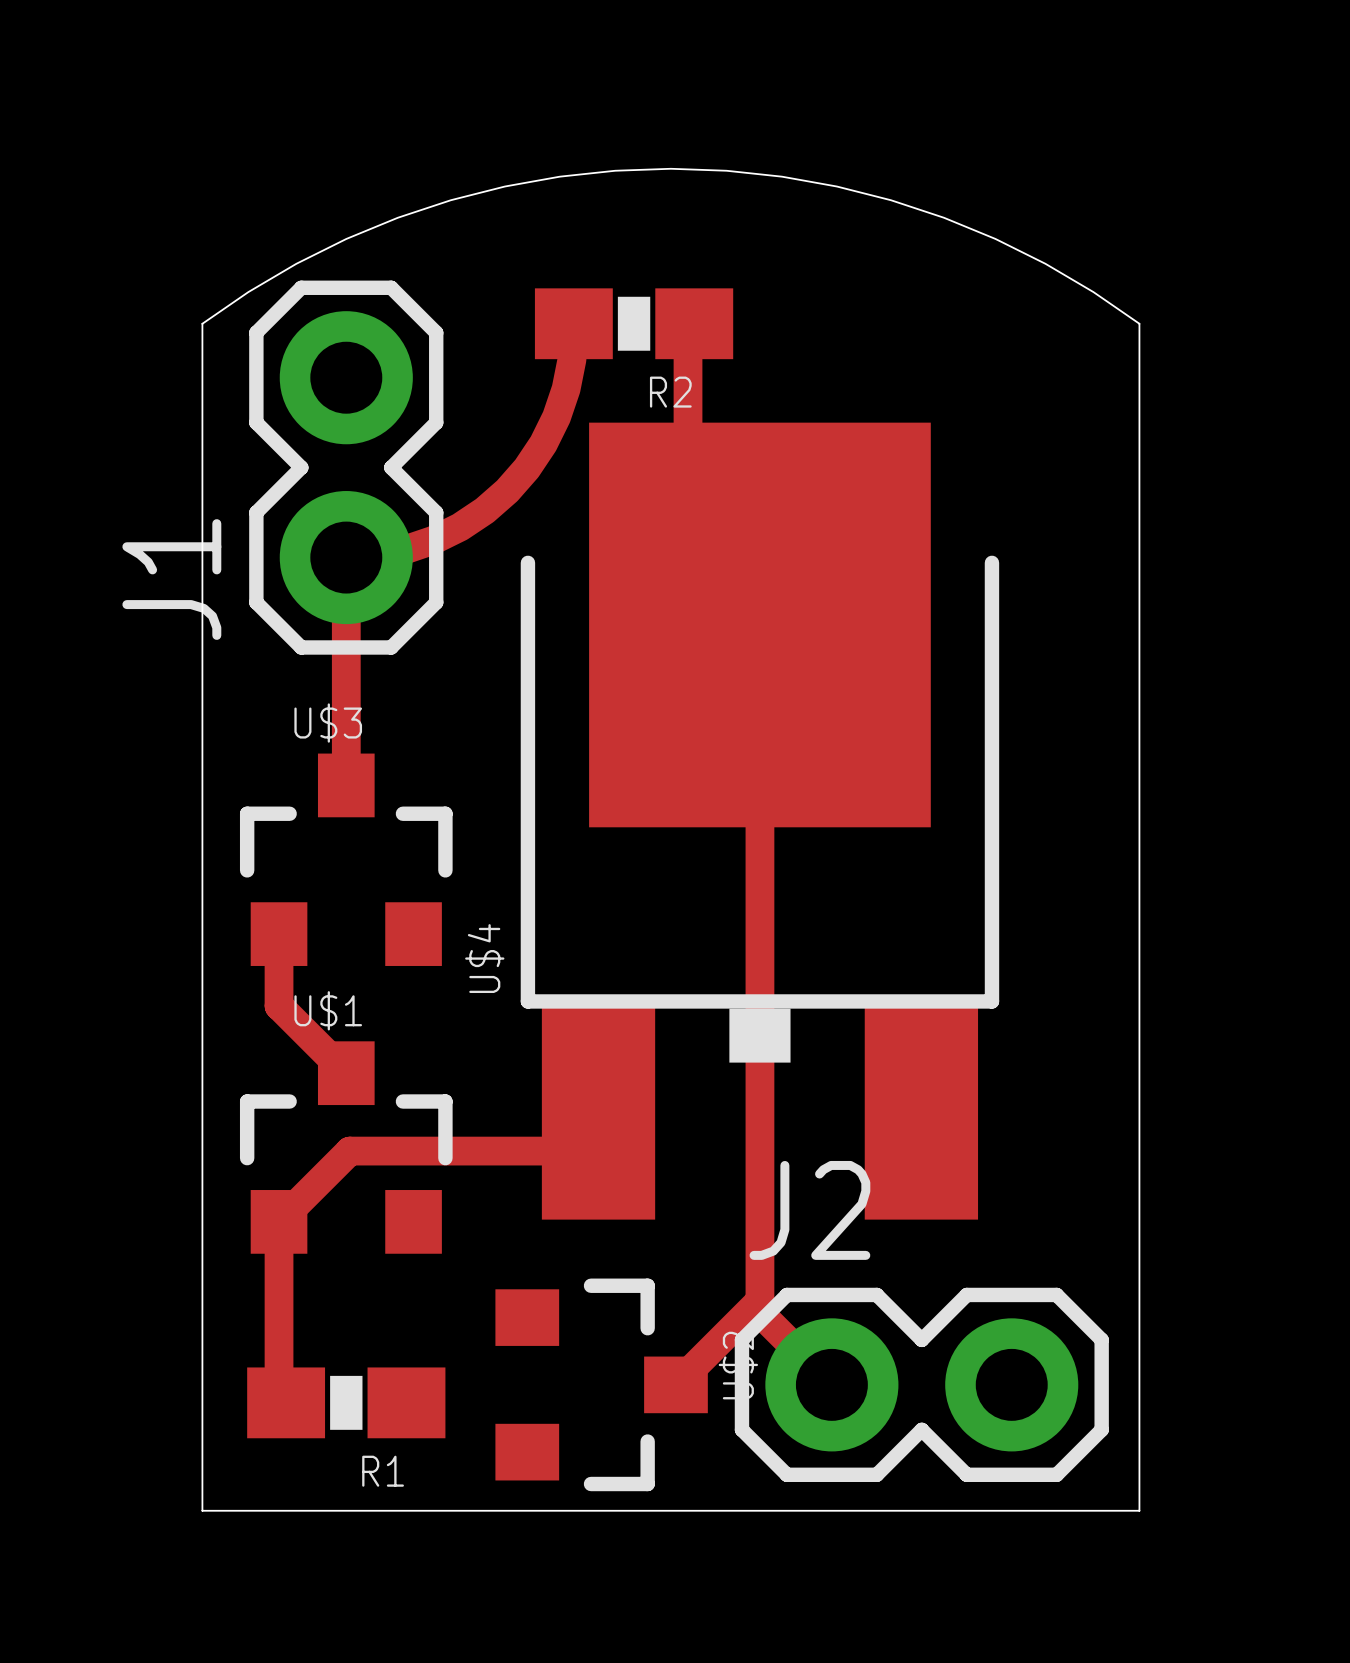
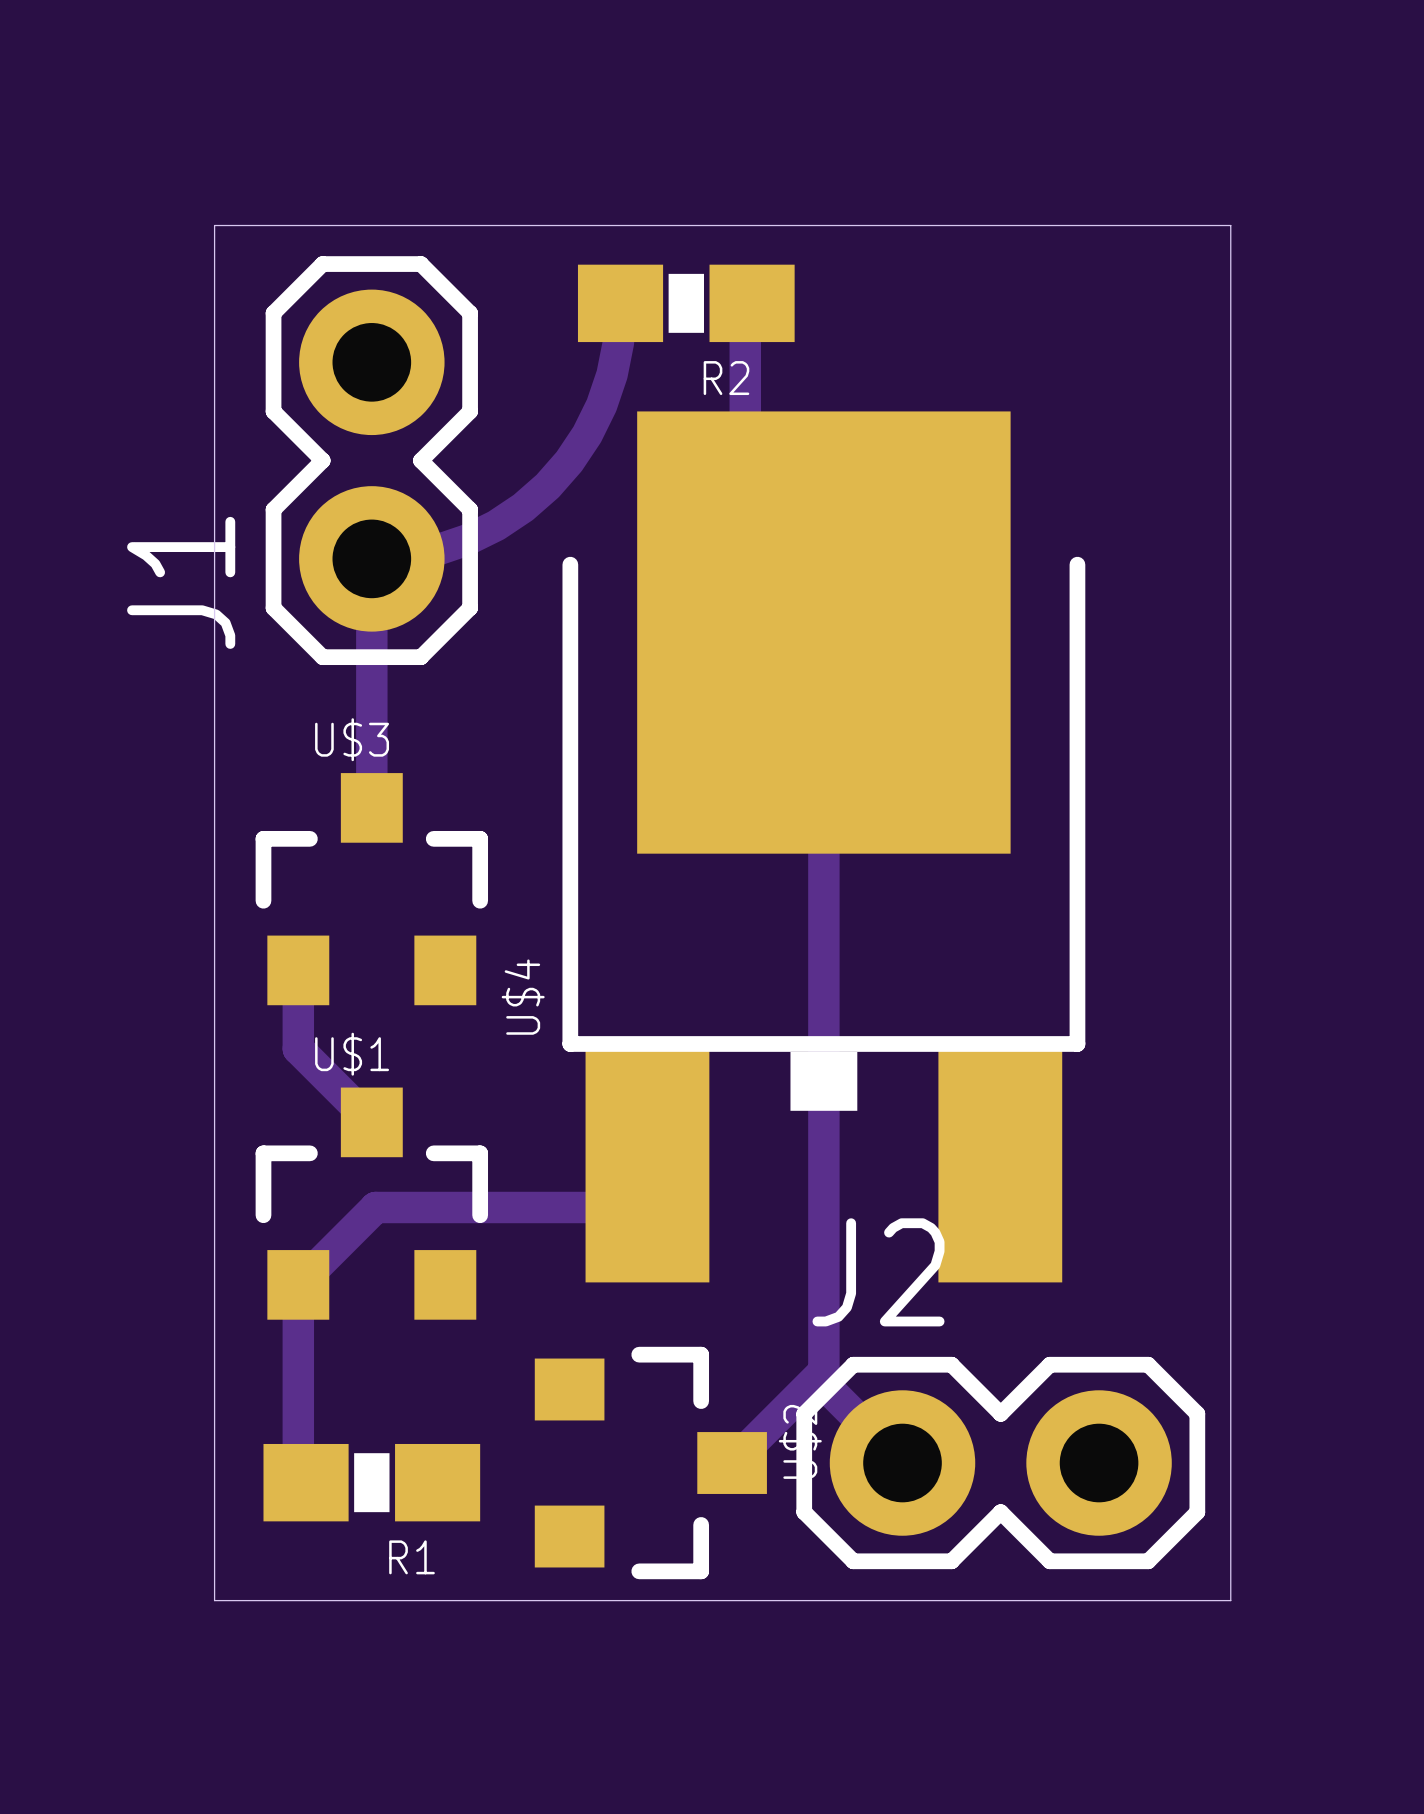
board edge: (202, 323) (248, 292) (296, 263) (346, 238) (397, 217) (450, 200) (504, 186) (559, 176) (615, 170) (670, 168) (726, 170) (782, 176) (836, 186) (891, 200) (943, 217) (995, 238) (1045, 263) (1093, 292) (1139, 323) (1139, 1510) (1132, 1510) -> (214, 303) (214, 225) (1230, 225) (1230, 1600)

